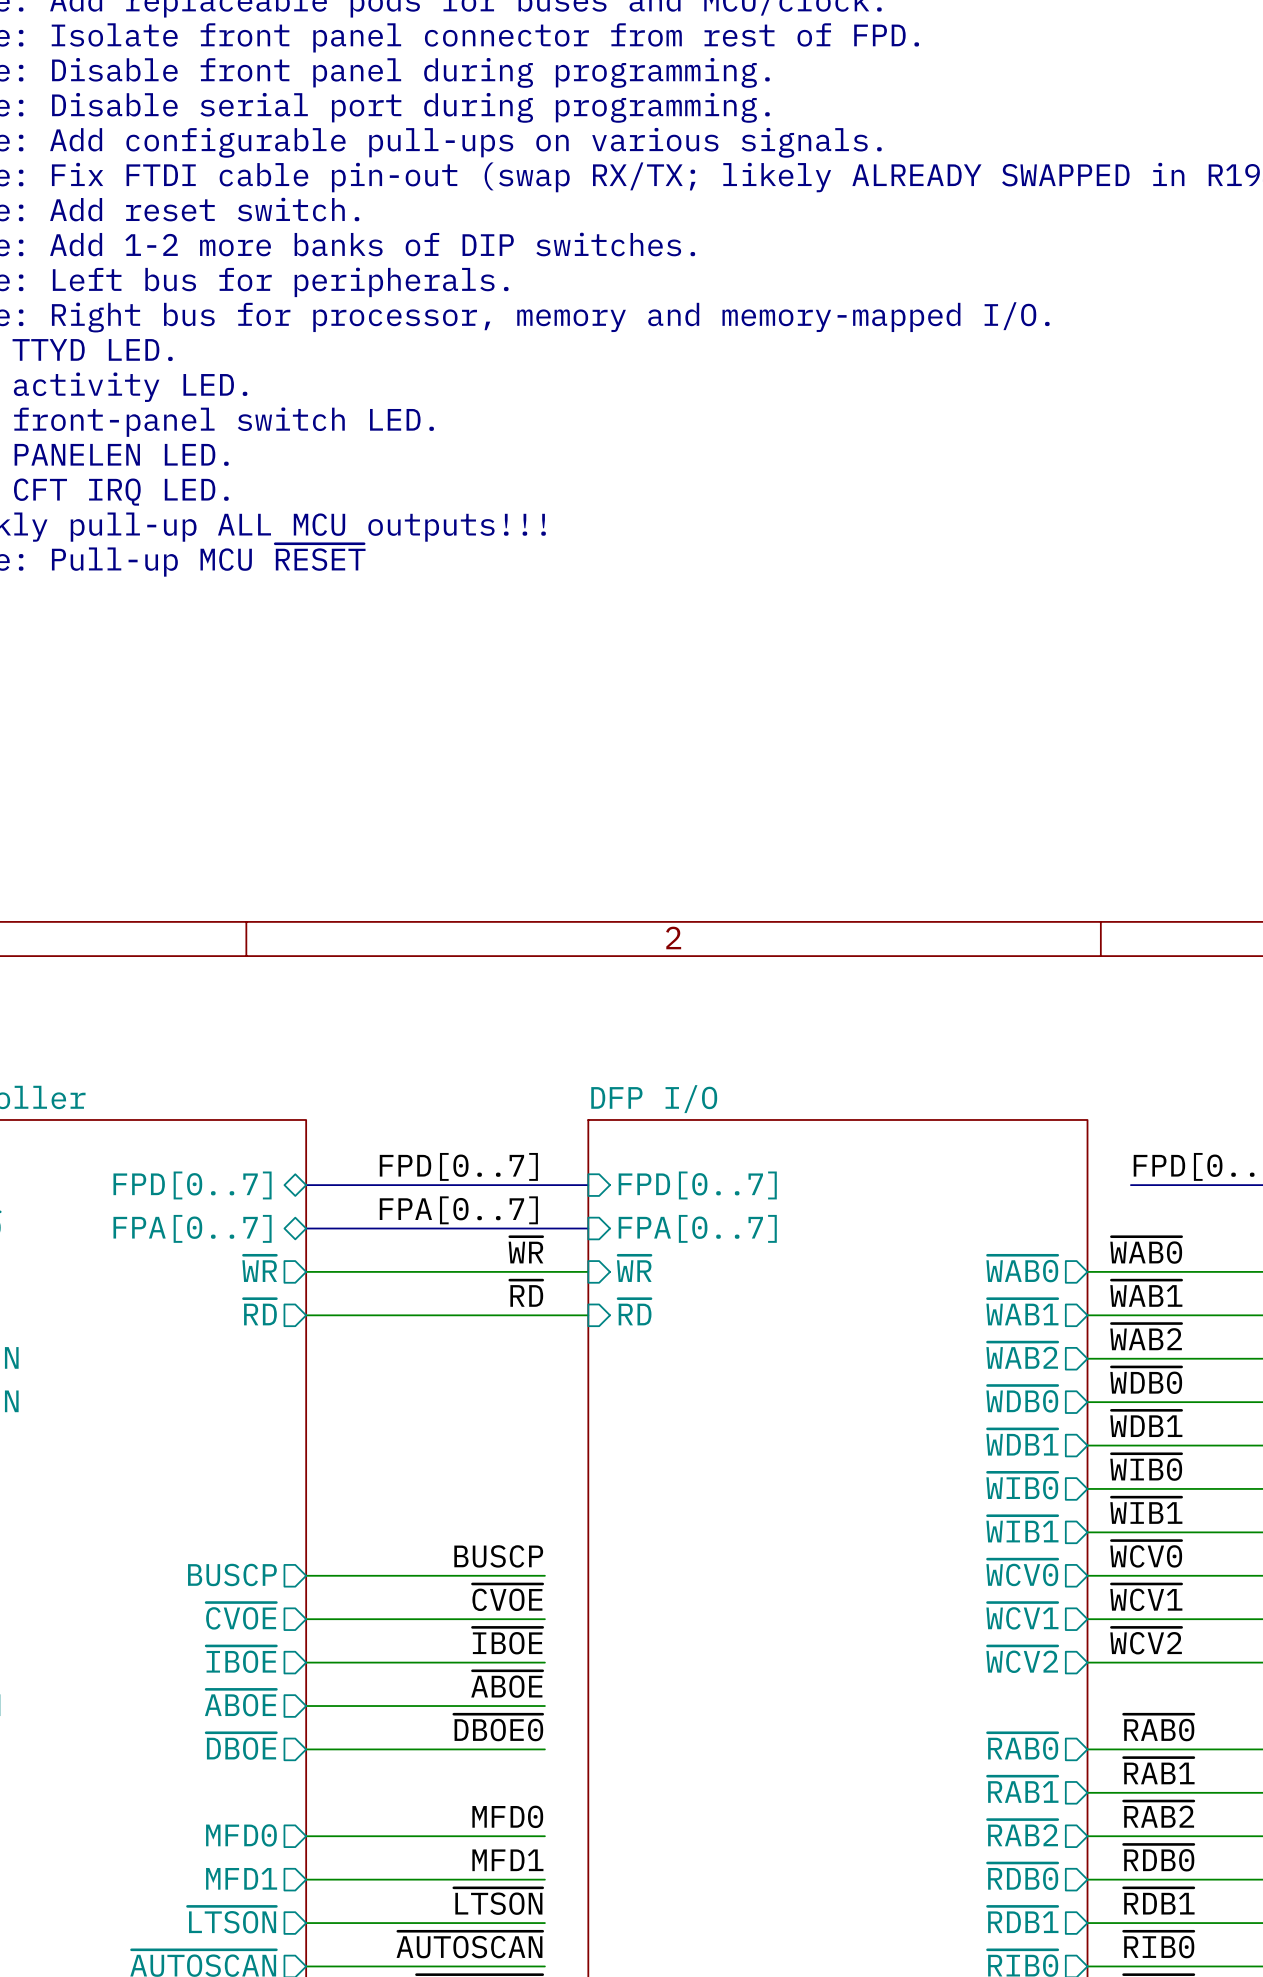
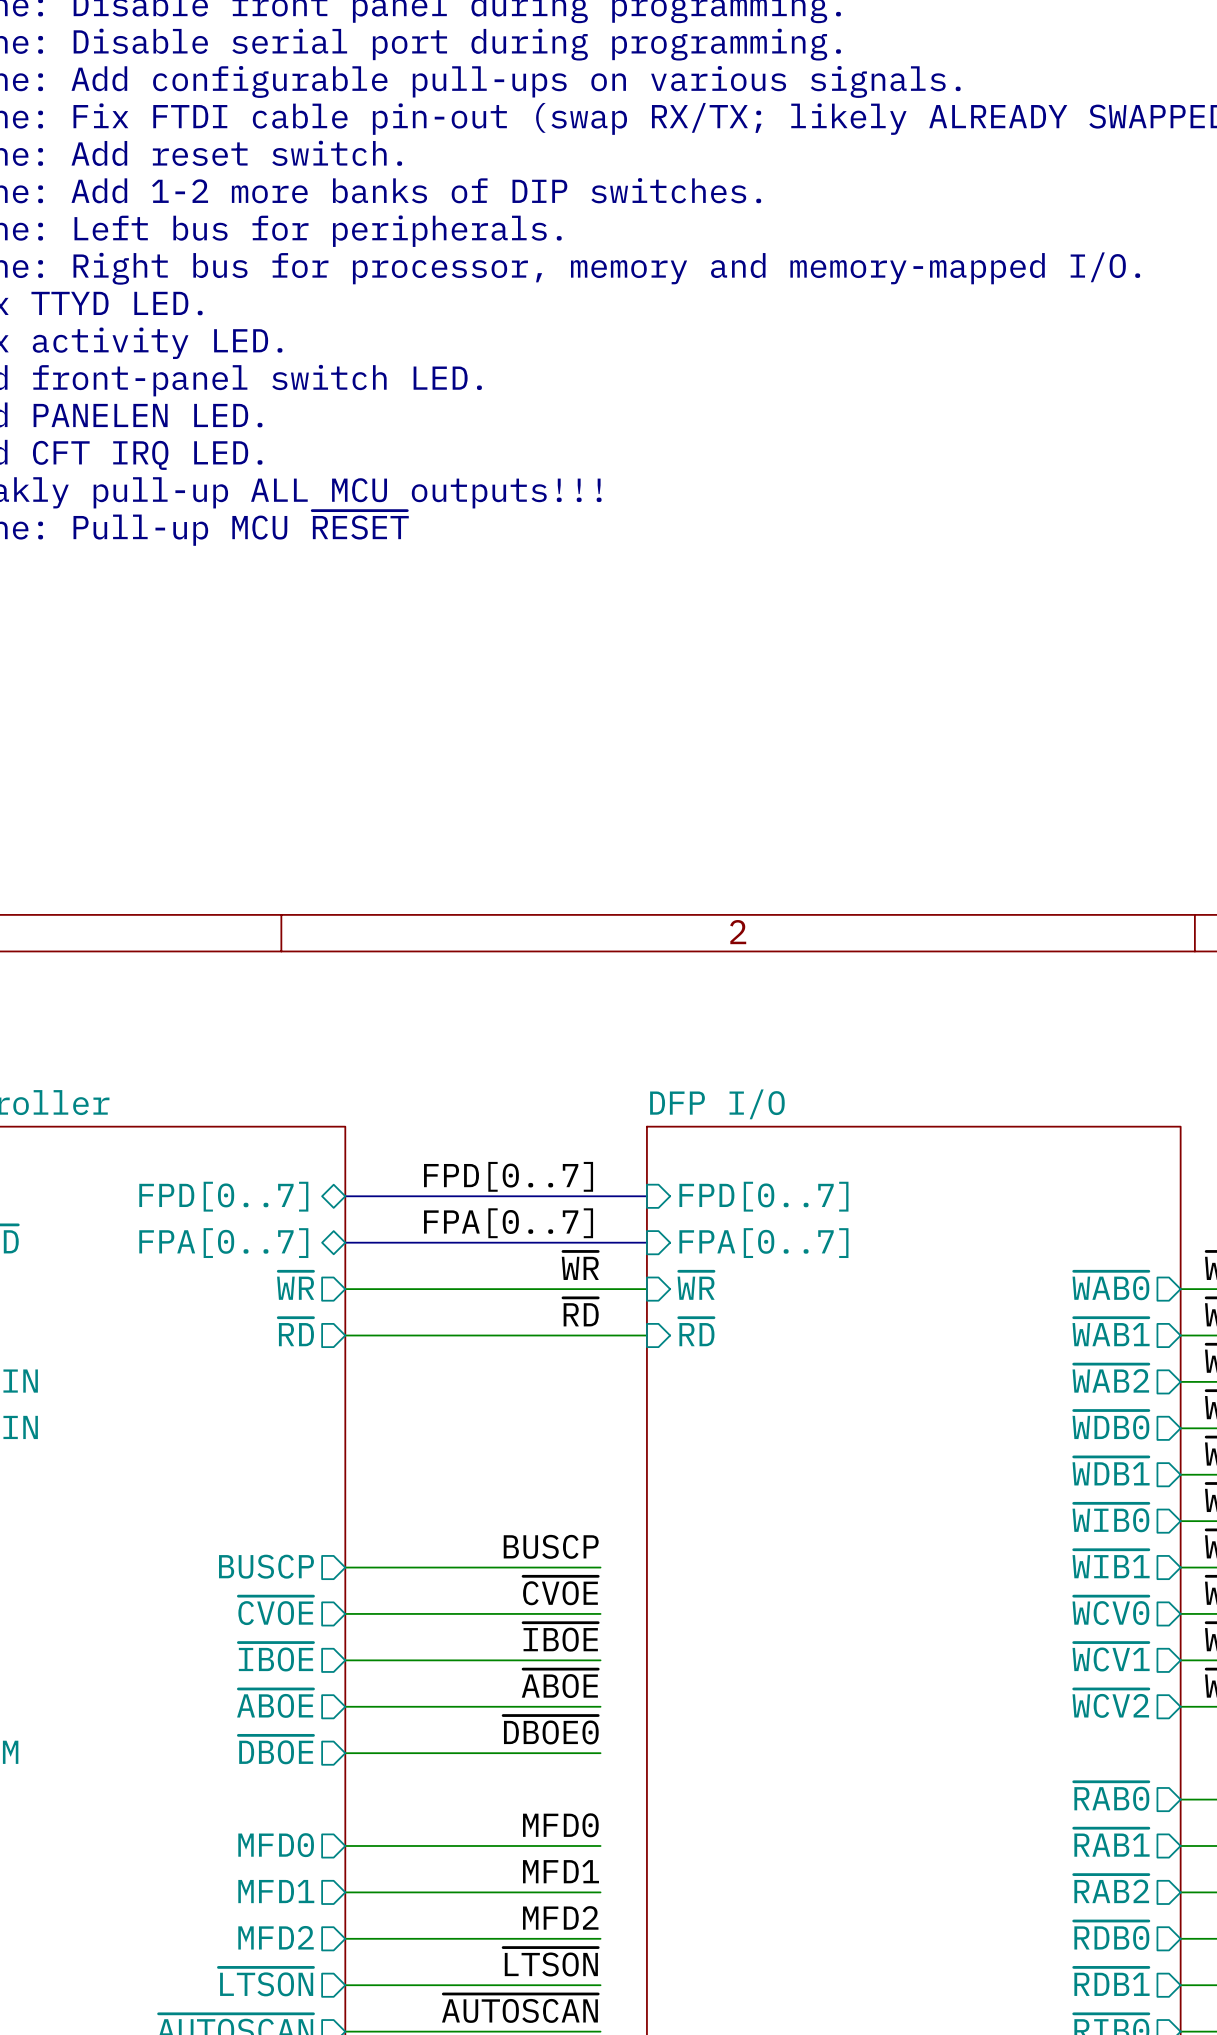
label: none -> BUSCP (551, 1546)
sheet pin: none -> BUSCP (266, 1566)
wire: none -> (345, 1567) (600, 1567)
label: BUSCP (498, 1556) -> ~{CVOE} (560, 1590)
sheet pin: BUSCP (232, 1574) -> ~{CVOE} (275, 1610)
label: ~{CVOE} (507, 1597) -> ~{IBOE} (560, 1637)
sheet pin: ~{CVOE} (241, 1616) -> ~{IBOE} (275, 1657)
label: ~{IBOE} (507, 1640) -> ~{ABOE} (560, 1683)
sheet pin: ~{IBOE} (241, 1659) -> ~{ABOE} (275, 1703)
label: ~{ABOE} (506, 1684) -> ~{DBOE0} (550, 1730)
sheet pin: ~{ABOE} (240, 1702) -> ~{DBOE} (275, 1749)
label: ~{DBOE0} (498, 1727) -> none
sheet pin: ~{DBOE} (241, 1746) -> none
wire: (306, 1749) (544, 1749) -> (345, 1845) (600, 1845)
label: none -> MFD0 (560, 1825)
sheet pin: none -> MFD0 (276, 1845)
label: MFD0 (507, 1816) -> MFD1 (561, 1871)
sheet pin: MFD0 (241, 1835) -> MFD1 (276, 1891)
label: MFD1 (507, 1860) -> MFD2 (560, 1917)
sheet pin: MFD1 (241, 1878) -> MFD2 (276, 1937)

